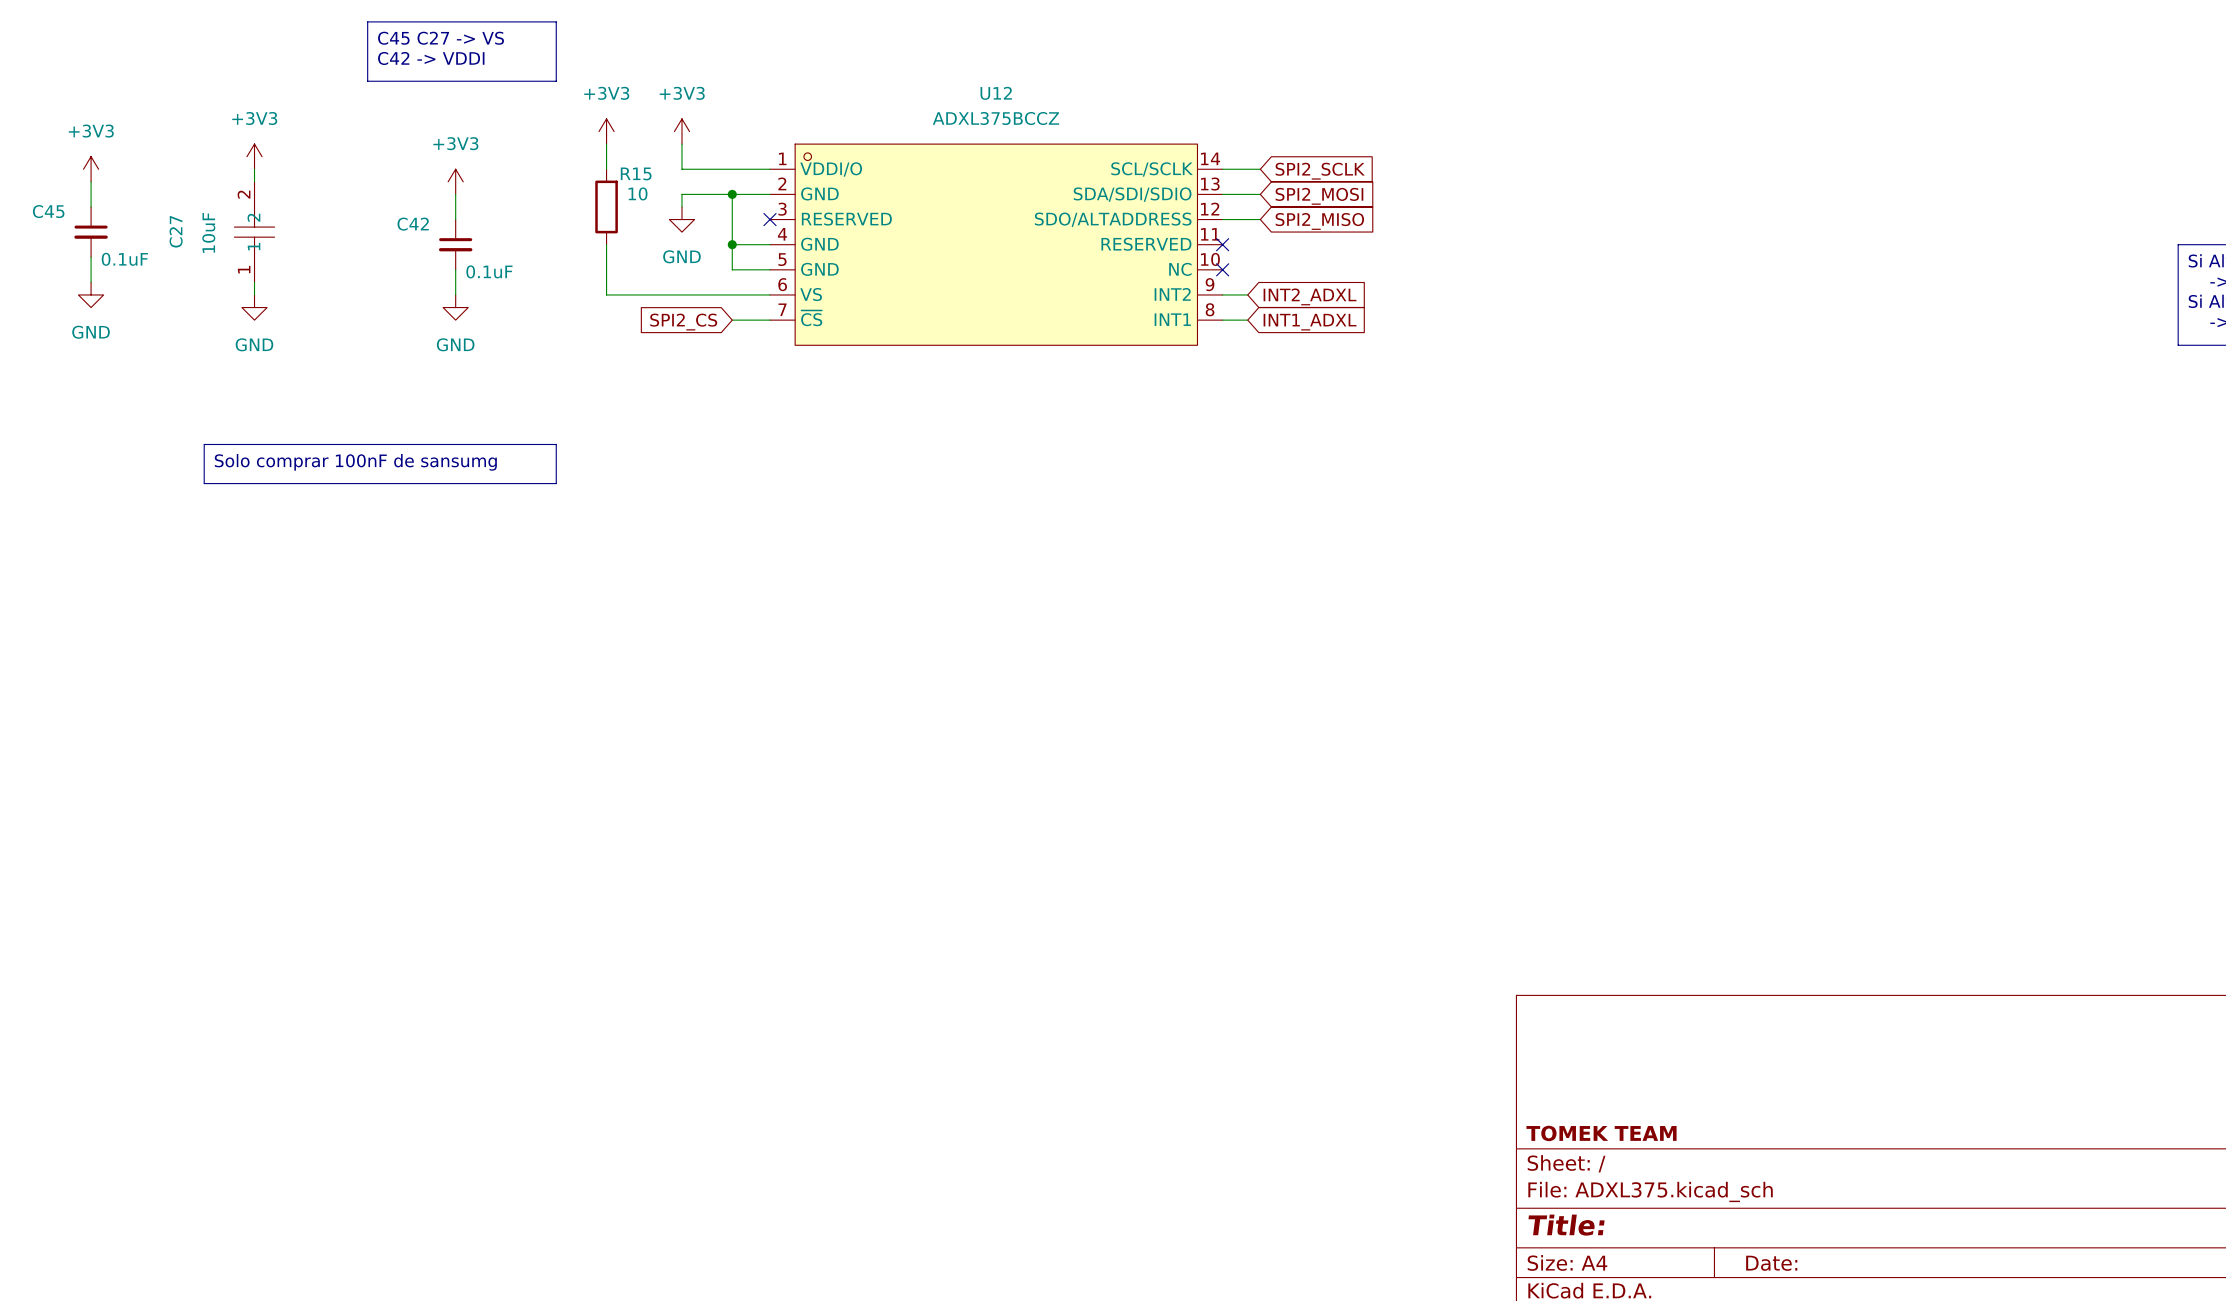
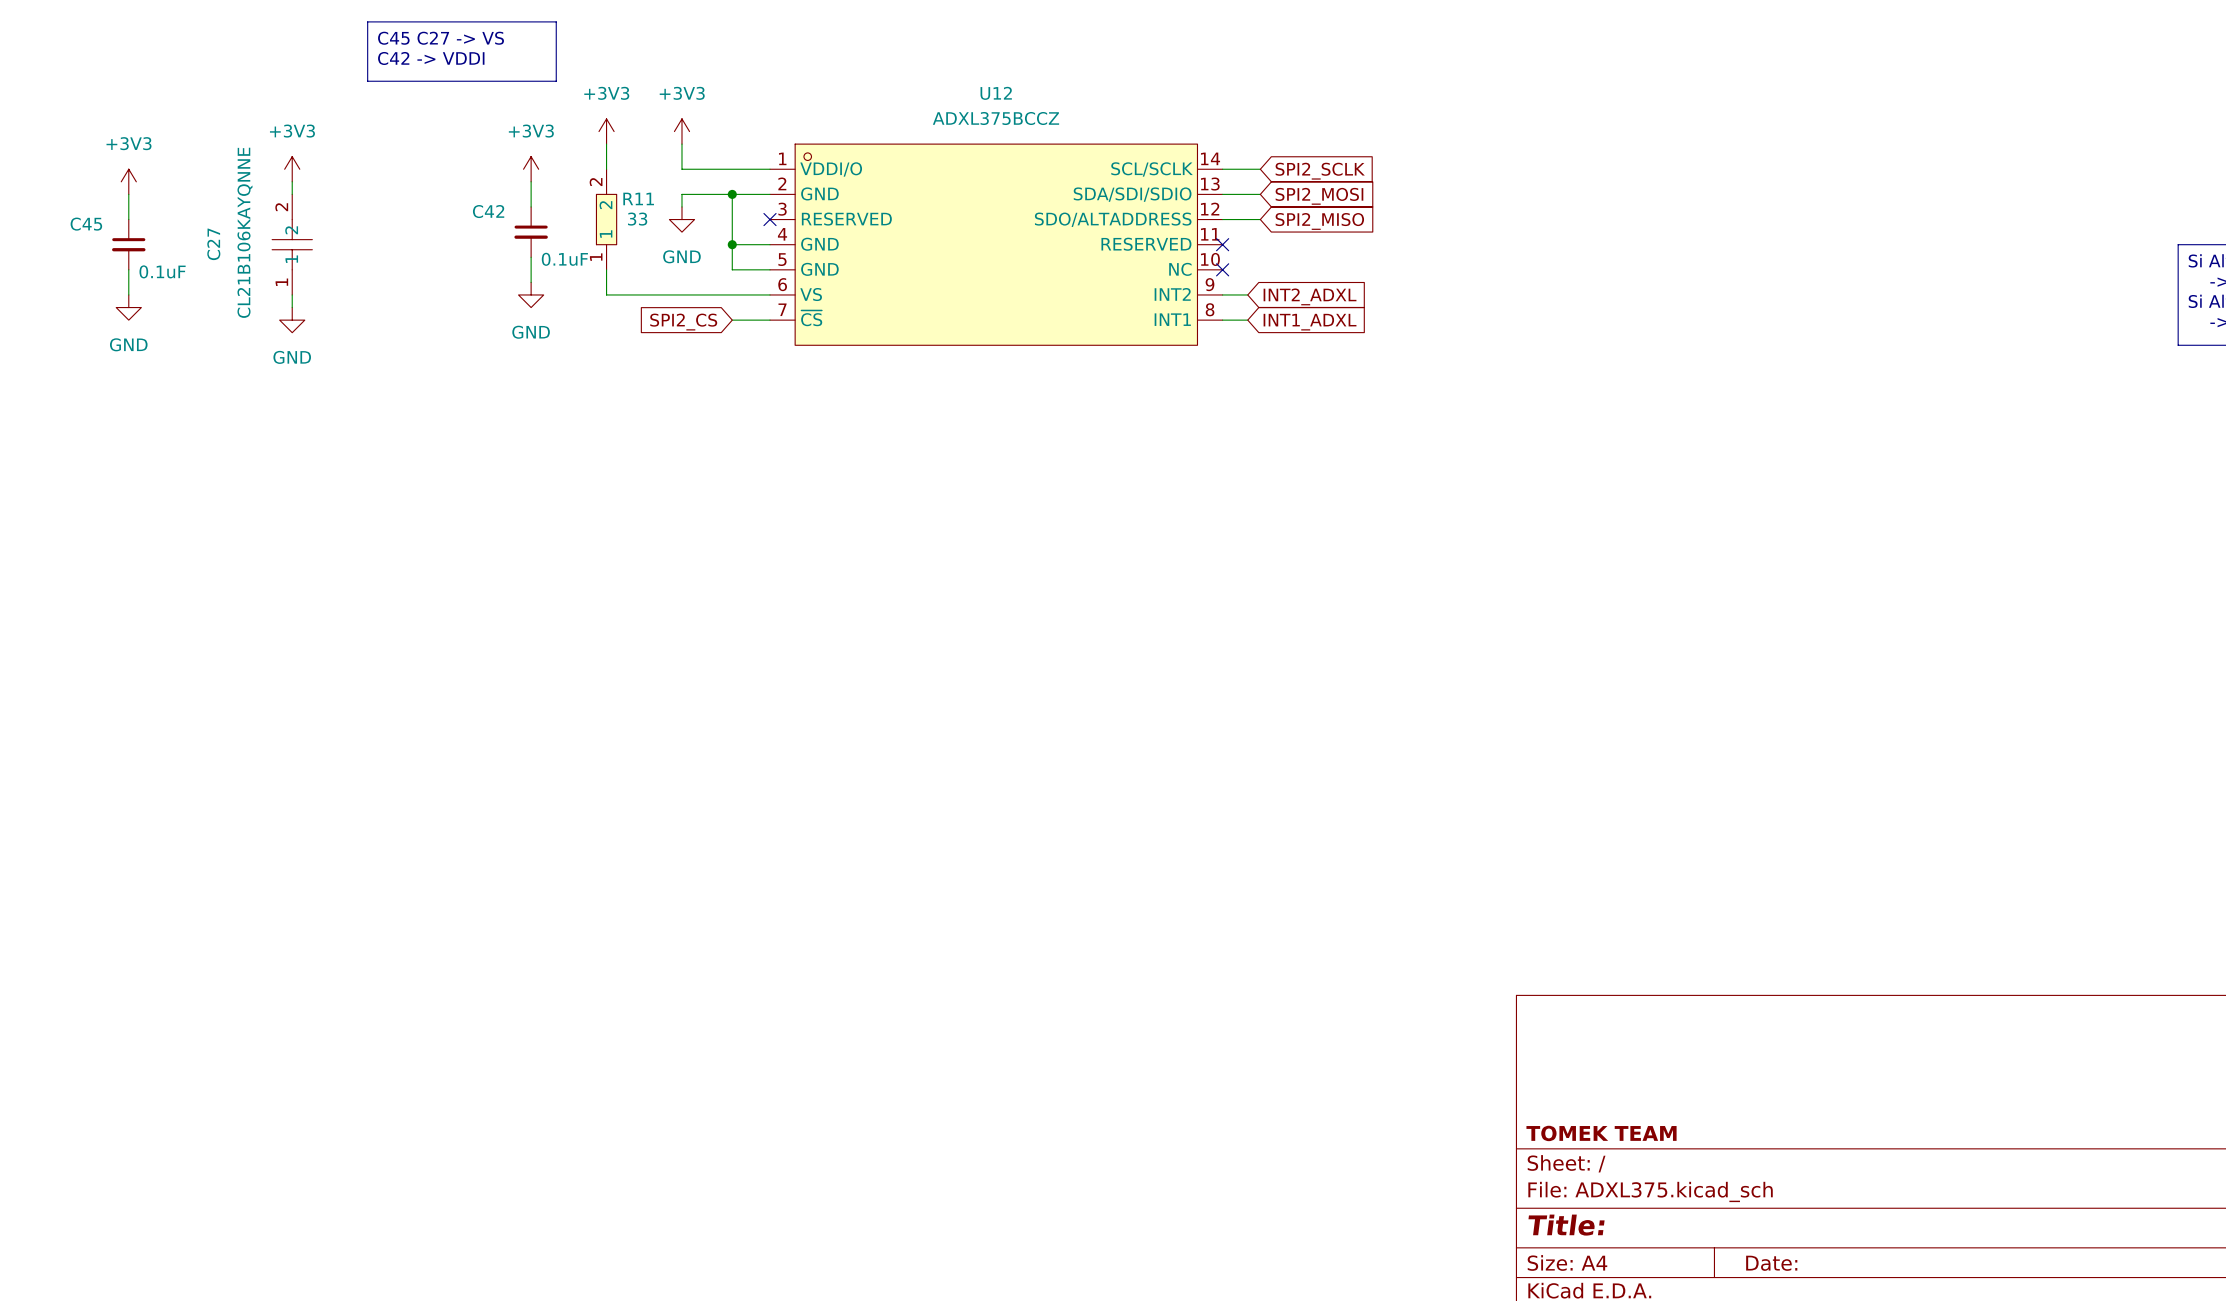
power symbol position: +3V3 (254, 156) -> +3V3 (292, 169)
power symbol position: +3V3 (91, 169) -> +3V3 (128, 181)
wire: (254, 169) (254, 181) -> (292, 181) (292, 194)
wire: (91, 181) (91, 206) -> (128, 194) (128, 219)
power symbol position: +3V3 (455, 181) -> +3V3 (531, 169)
wire: (455, 194) (455, 219) -> (531, 181) (531, 206)
R15: 10 (606, 206) -> none
R11: none -> 33 (606, 219)
C45 position: (91, 232) -> (128, 244)
C27 value: 10uF (208, 232) -> CL21B106KAYQNNE (244, 232)
C27 position: (254, 232) -> (292, 244)
C42 position: (455, 244) -> (531, 232)
wire: (91, 257) (91, 282) -> (128, 269) (128, 294)
wire: (455, 269) (455, 294) -> (531, 257) (531, 282)
wire: (254, 282) (254, 294) -> (292, 294) (292, 307)
power symbol position: GND (91, 294) -> GND (128, 307)
power symbol position: GND (254, 307) -> GND (292, 320)
power symbol position: GND (455, 307) -> GND (531, 294)
line: (204, 444) (556, 444) (556, 483) (204, 483) (204, 444) -> none
text: Solo comprar 100nF de sansumg (355, 462) -> none

